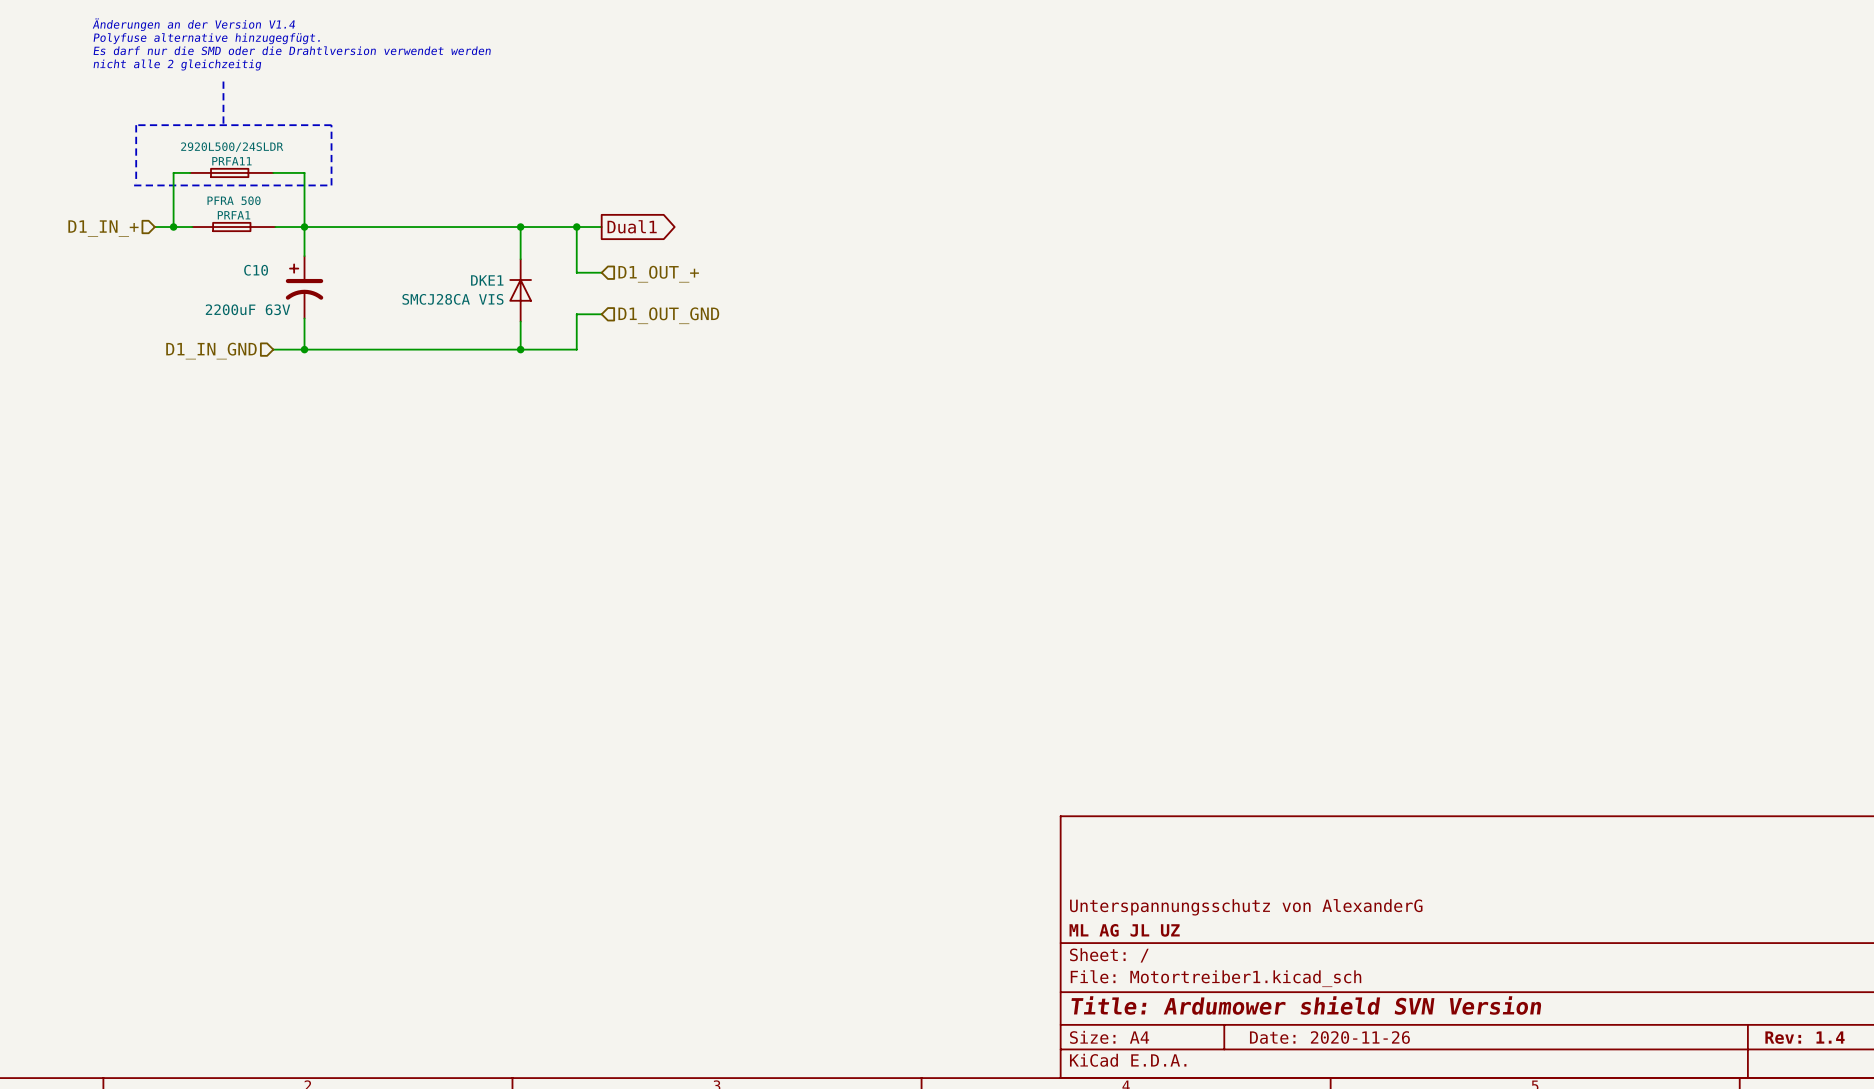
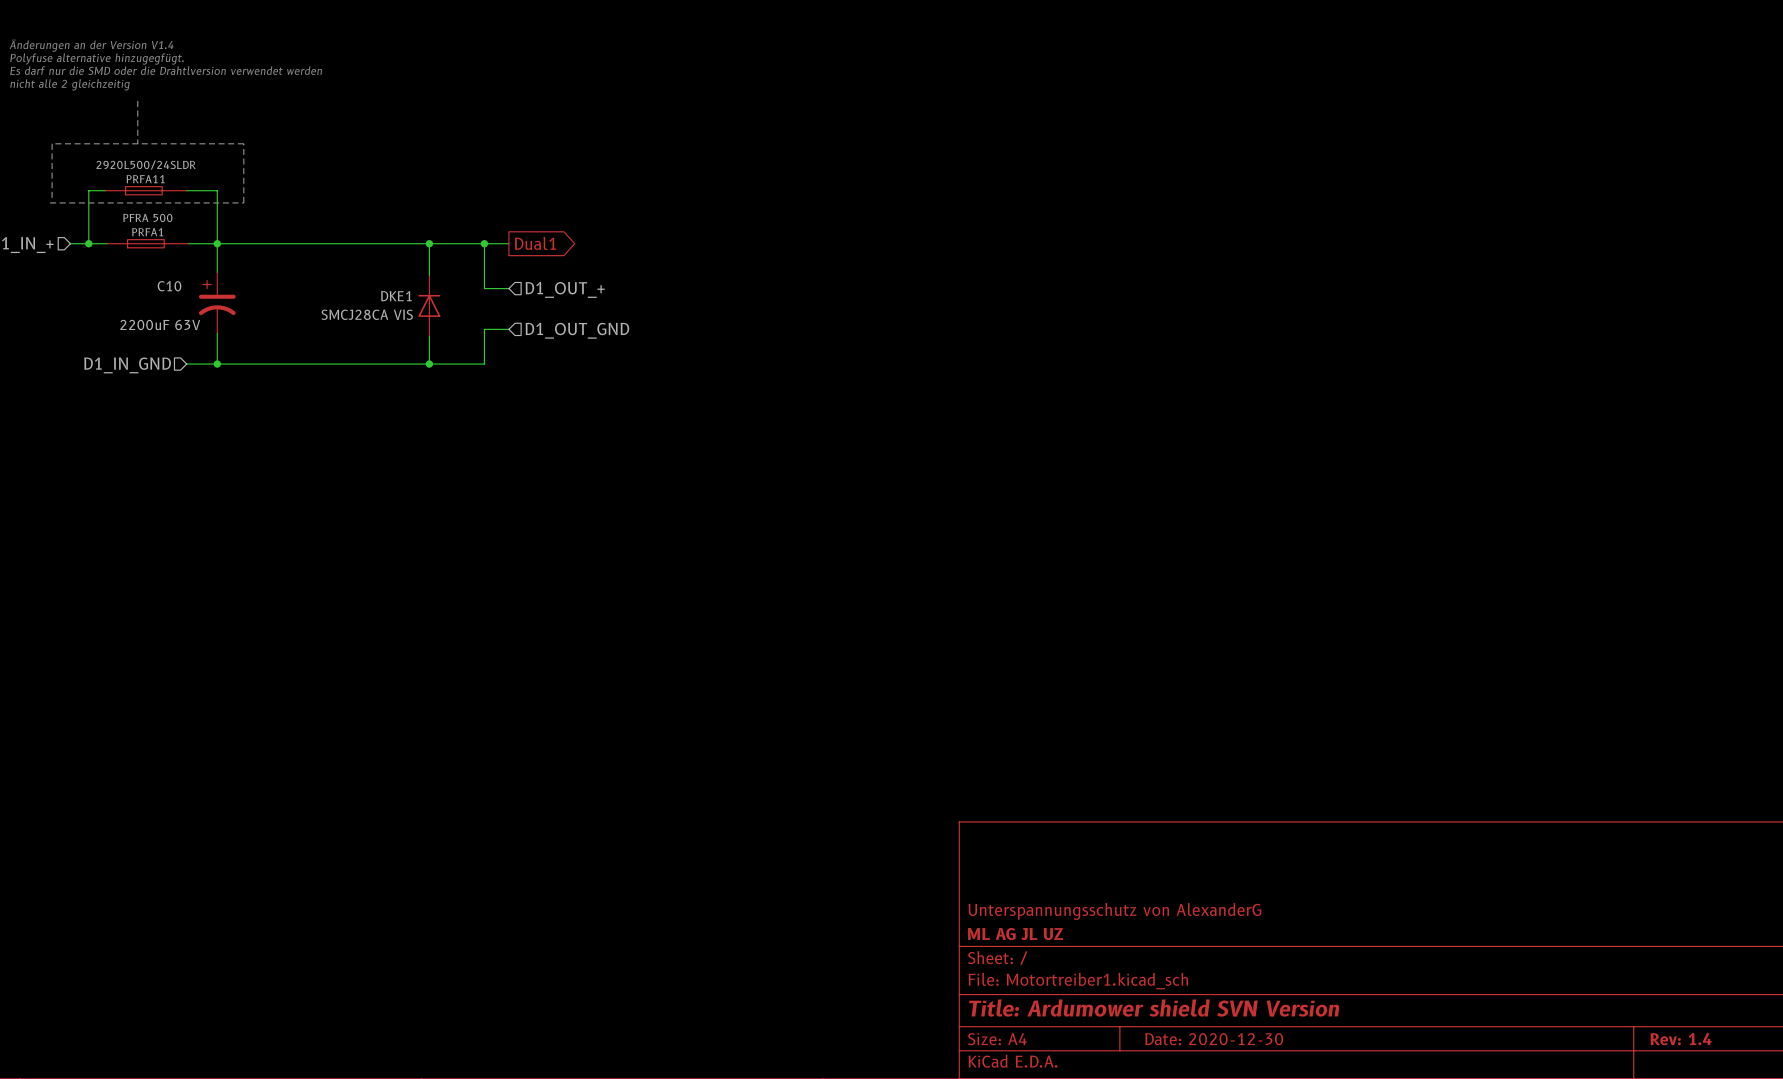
title block: Date: 2020-11-26 (1329, 1037) -> Date: 2020-12-30 (1214, 1039)

